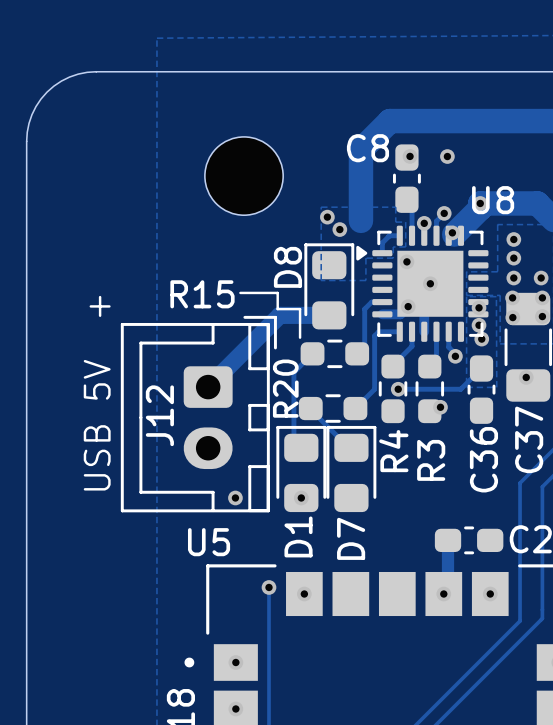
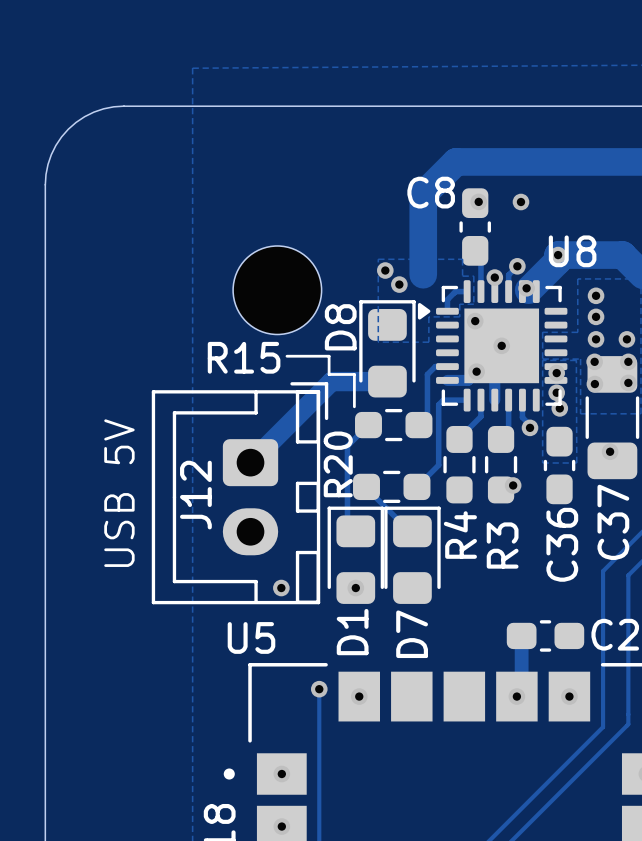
part position: (244, 176) -> (277, 290)
track: (481, 368) (460, 389) (398, 389) -> none
via: (398, 389) -> none
text: USB 5V + (97, 393) -> USB 5V (119, 493)

